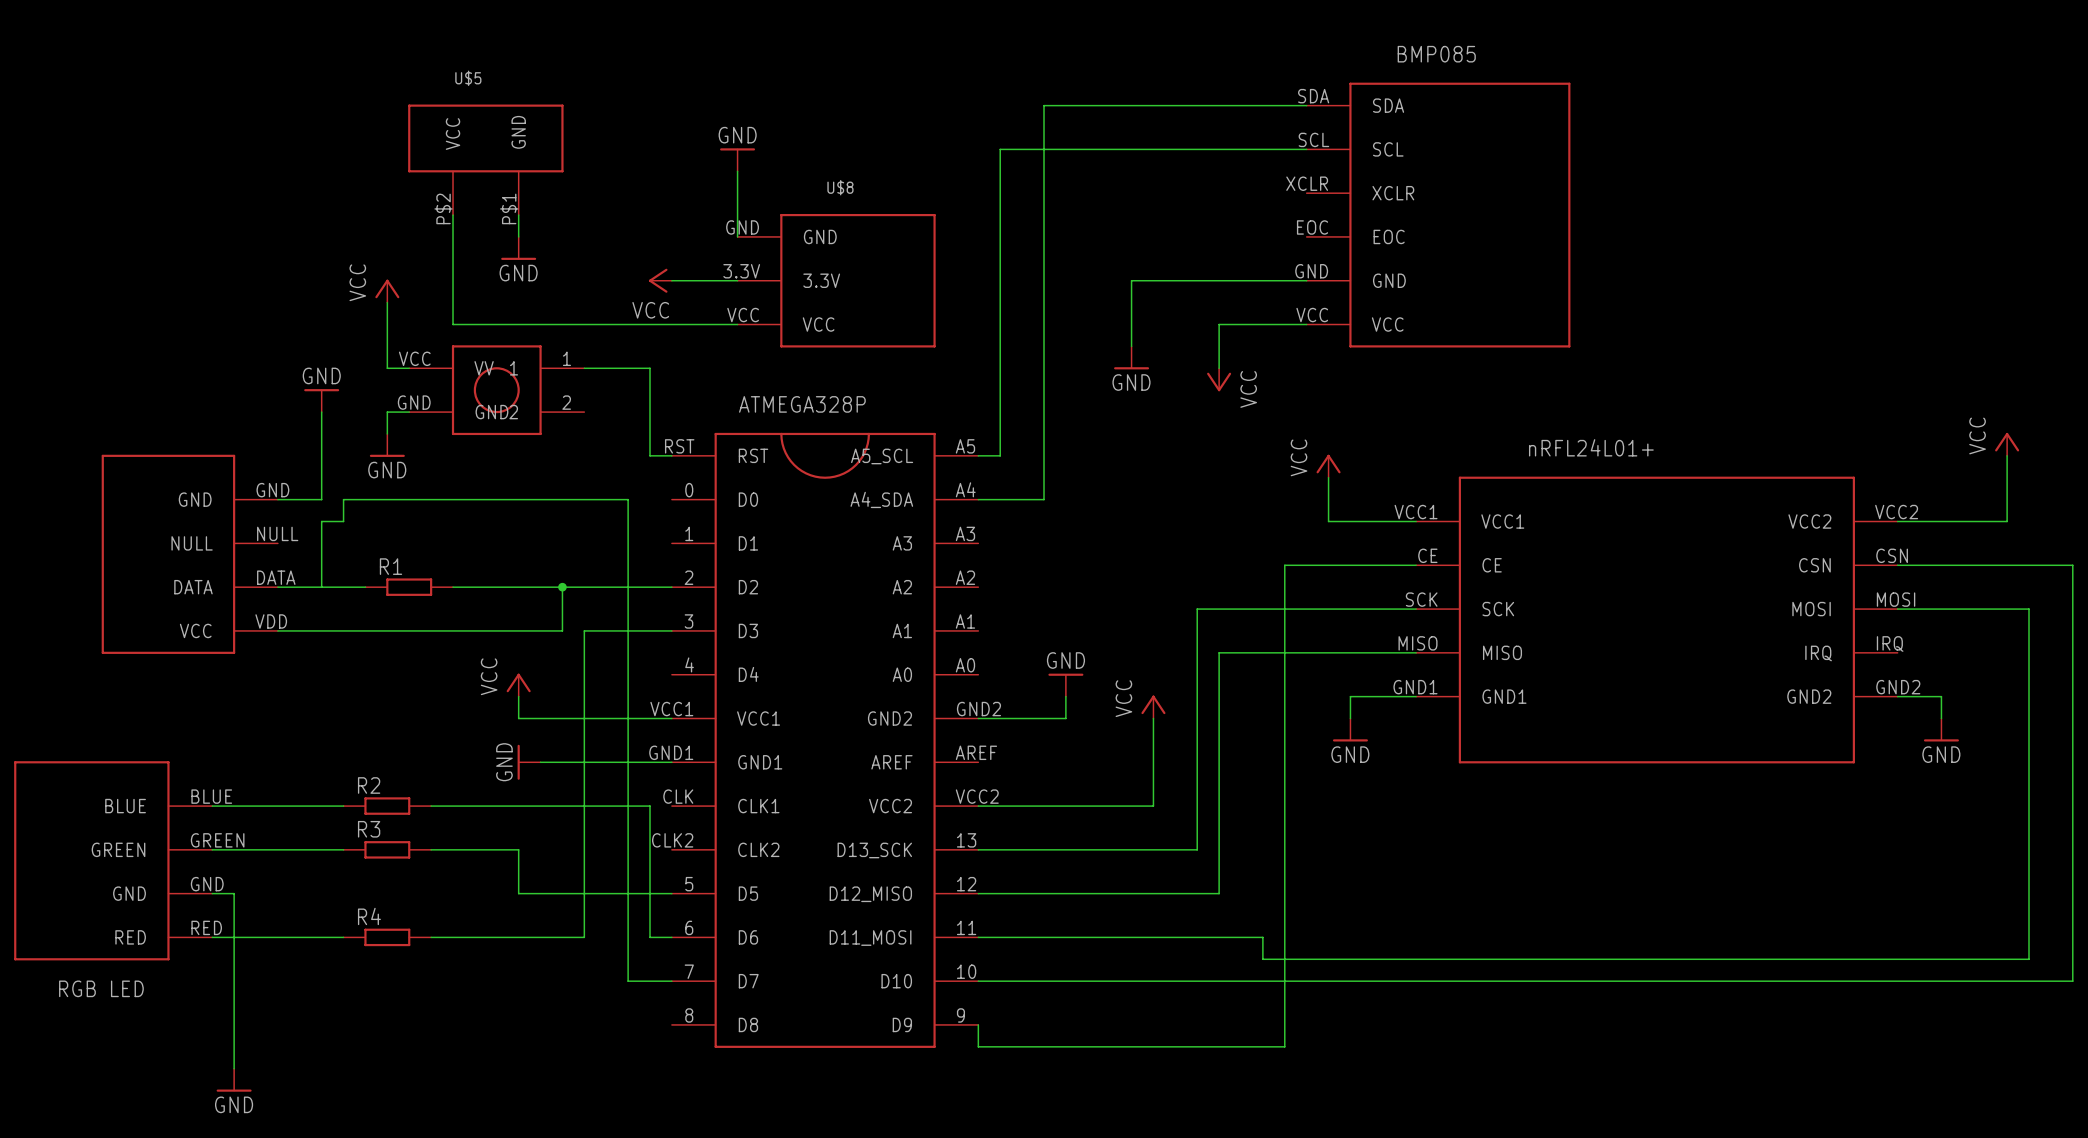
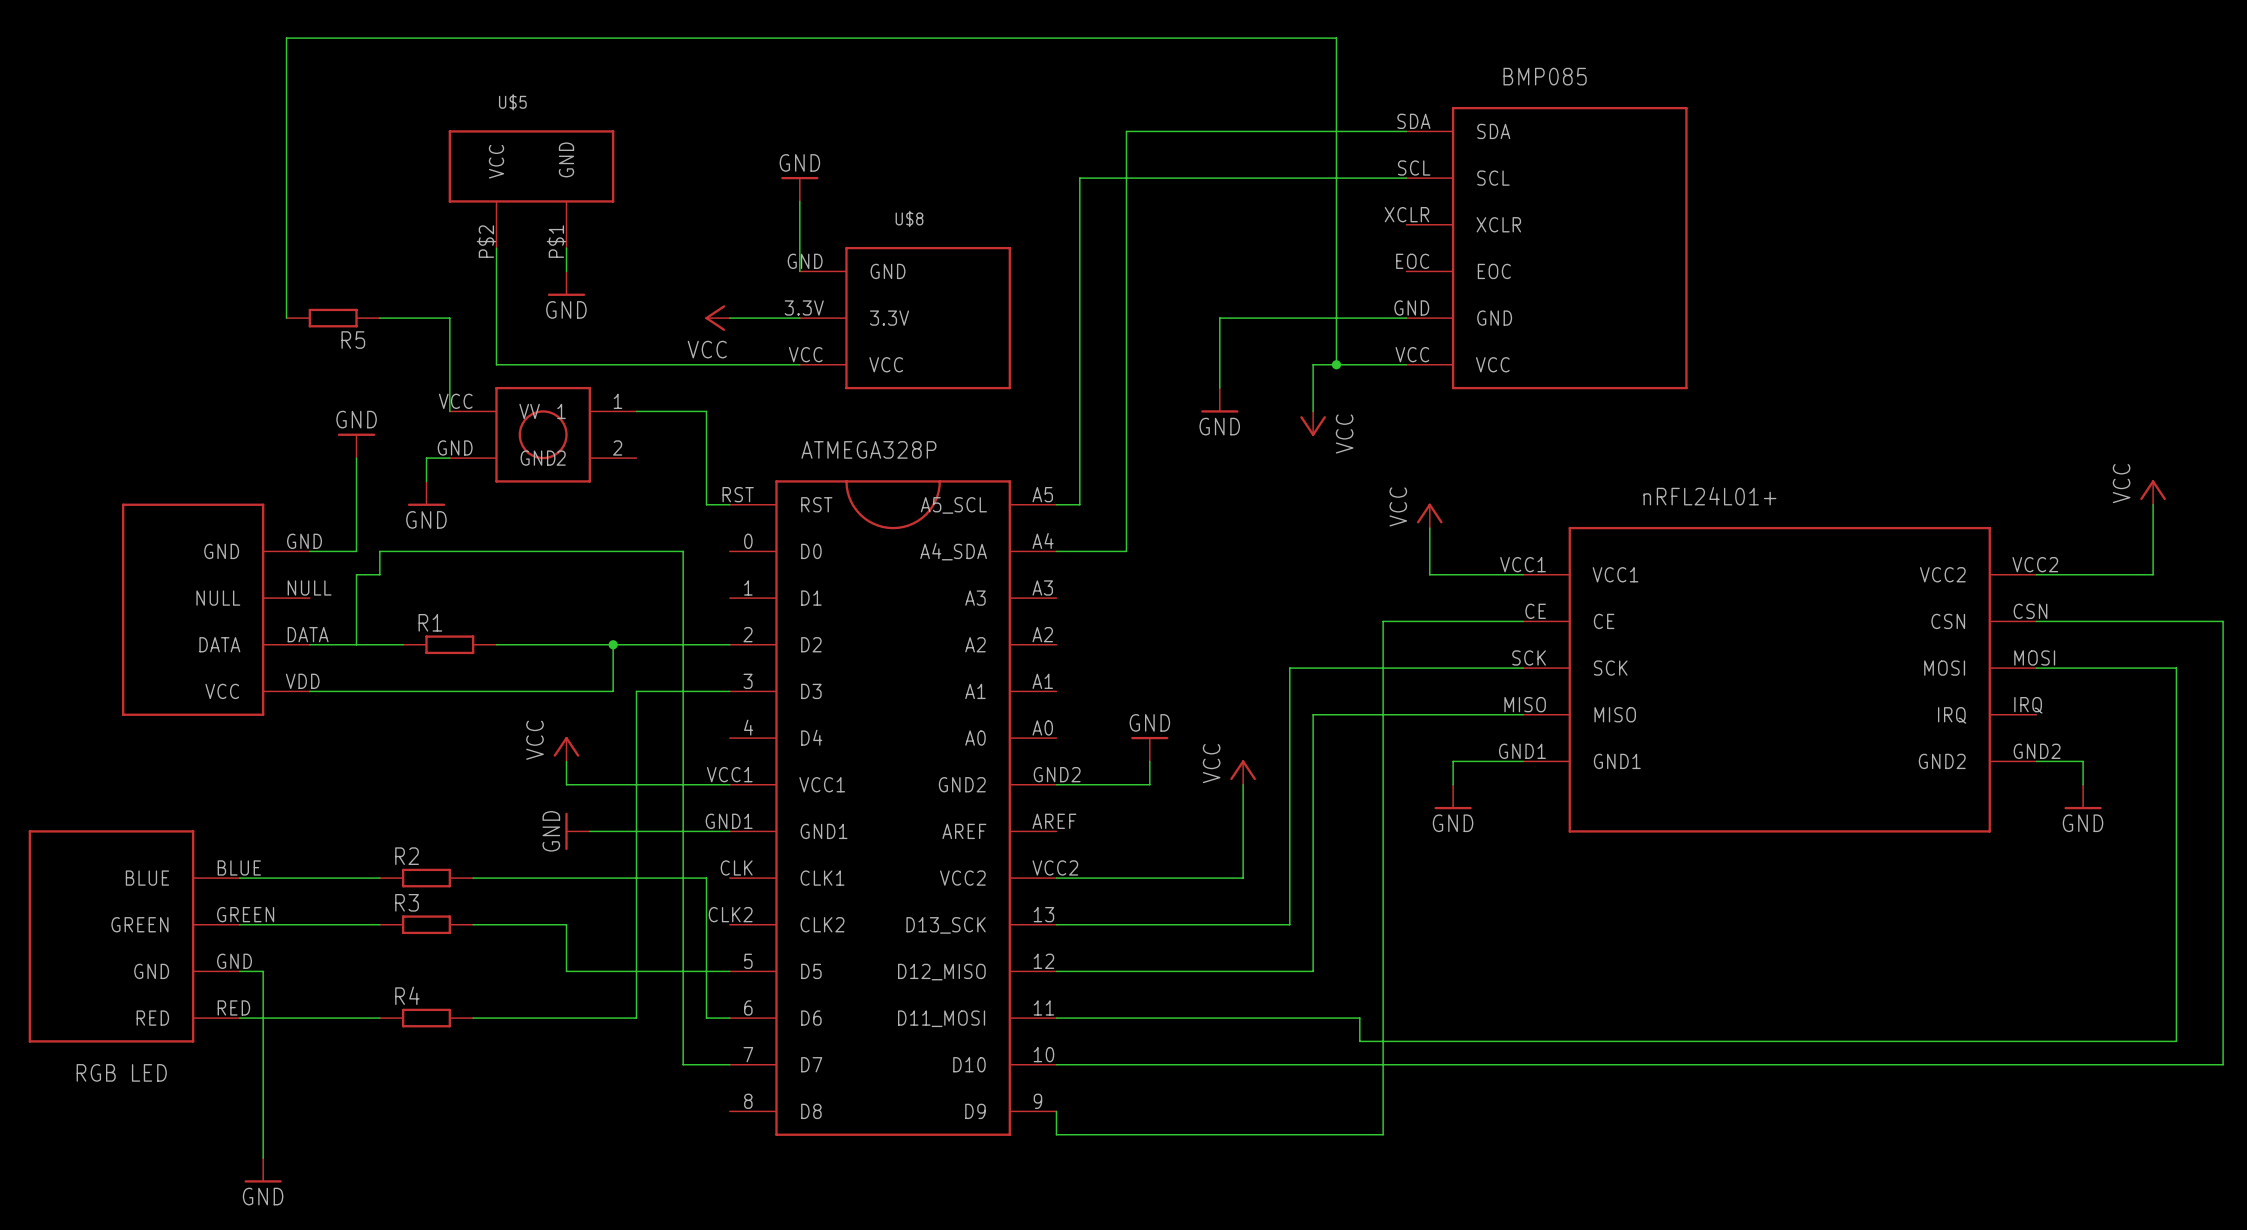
wire: none -> (286, 318) (286, 38) (1336, 38) (1336, 364)
R5: none -> (333, 318)
power symbol: VCC (387, 291) -> none
wire: (387, 302) (387, 368) (409, 368) -> (379, 318) (449, 318) (449, 411)
junction: none -> (1336, 364)

